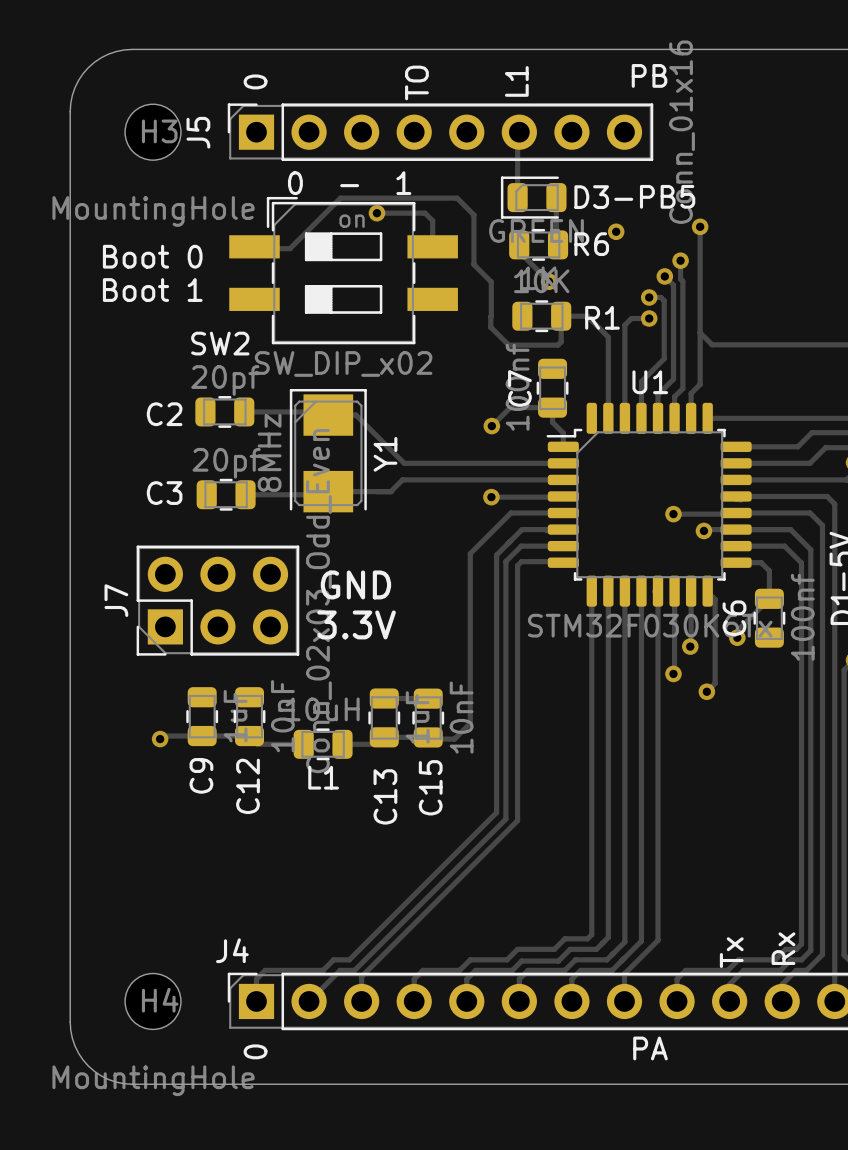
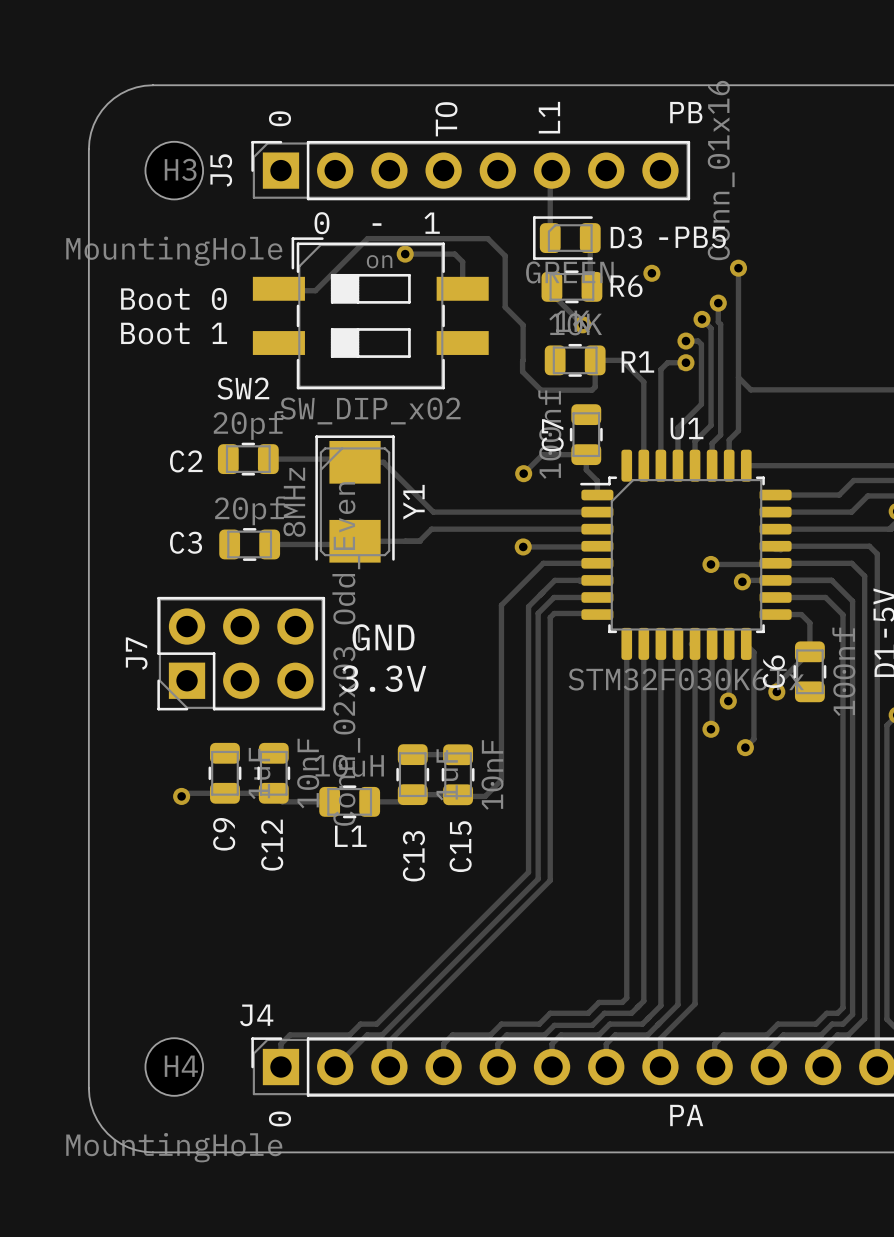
text: Rx (783, 948) -> none
text: Tx (731, 952) -> none

